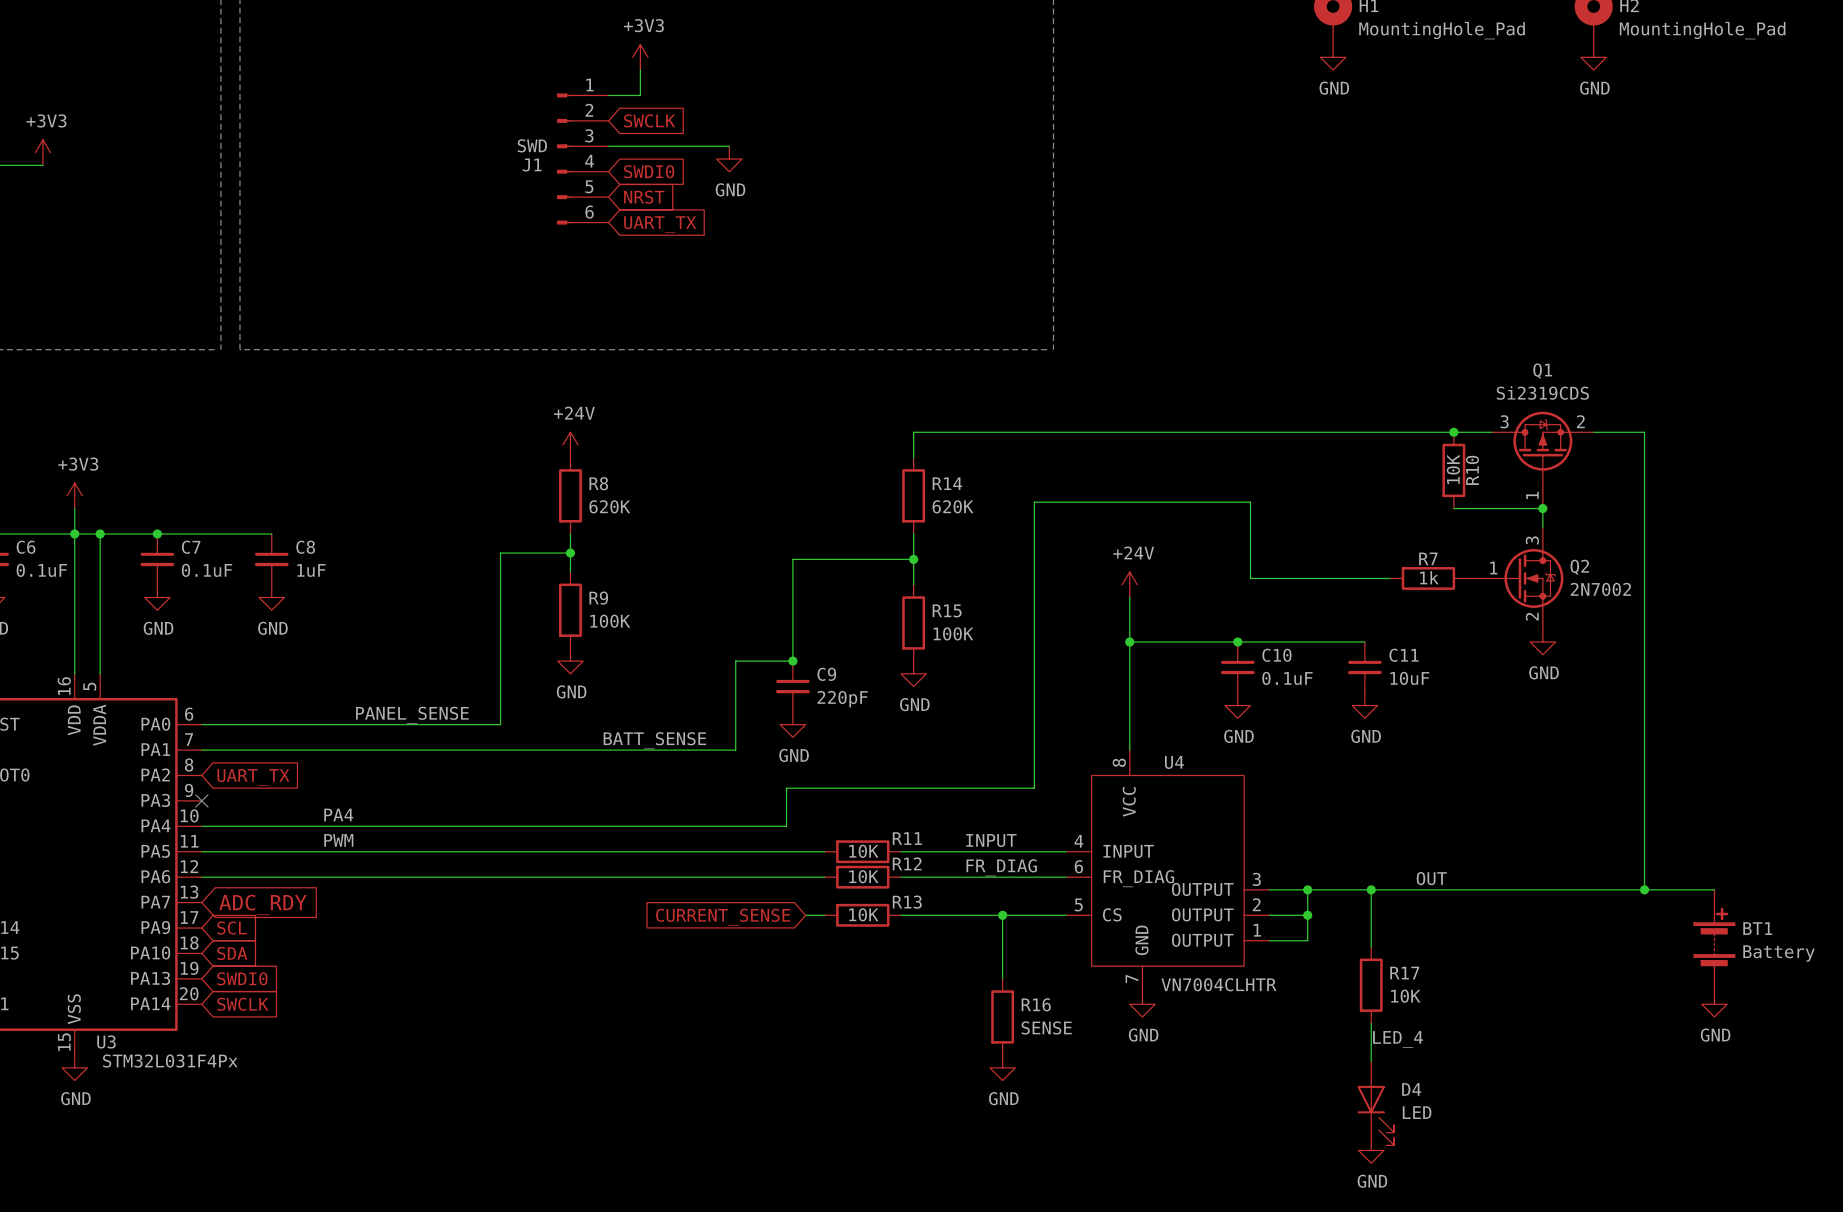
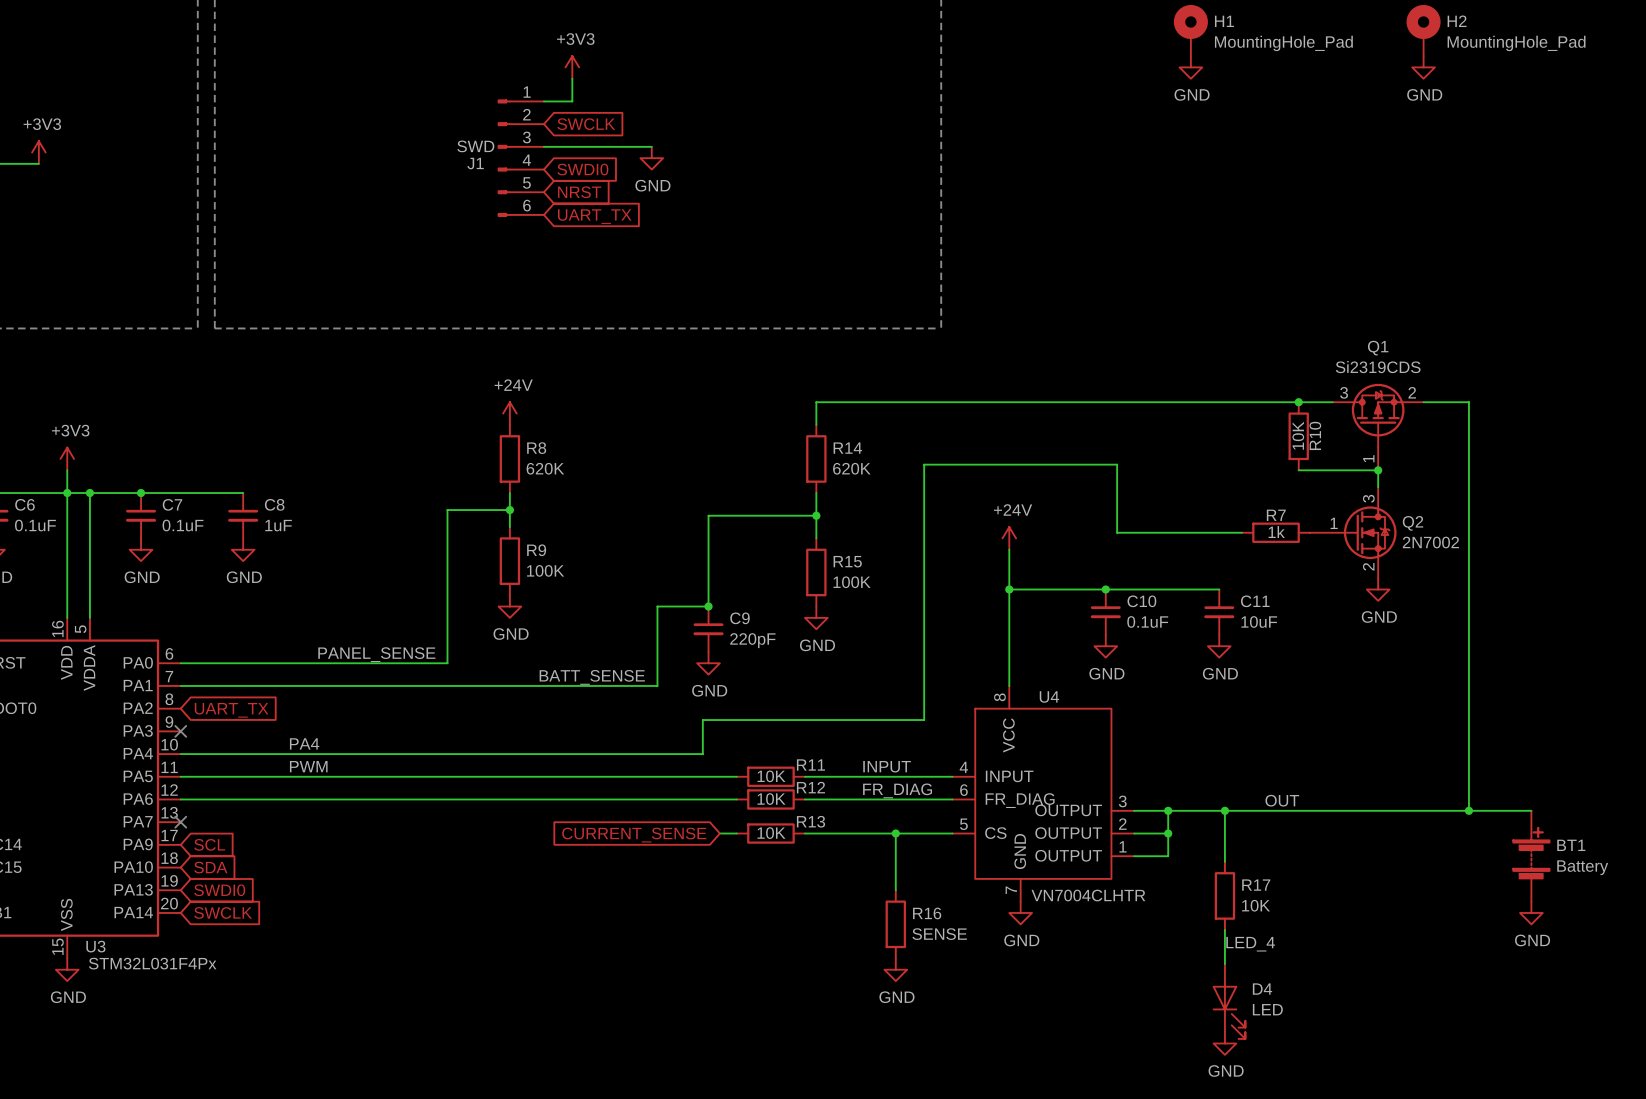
no-connect mark: none -> (180, 822)
global label: ADC_RDY (263, 904) -> none

